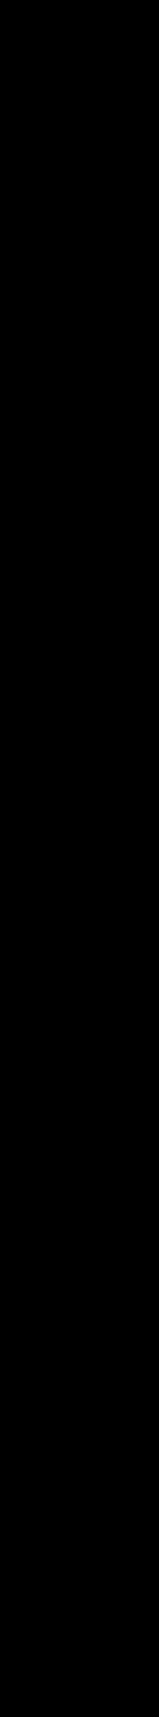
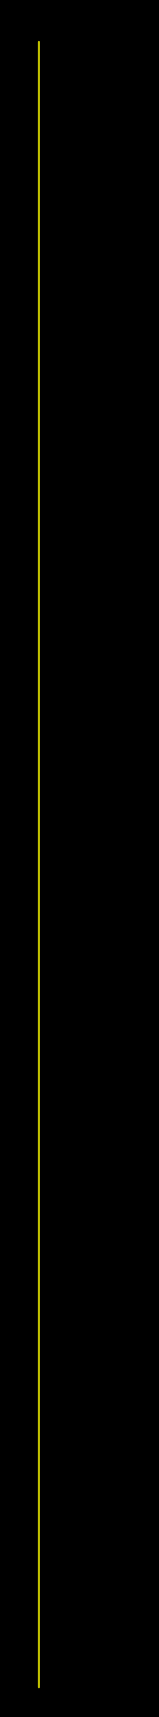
board edge: none -> (38, 41) (38, 1687)

